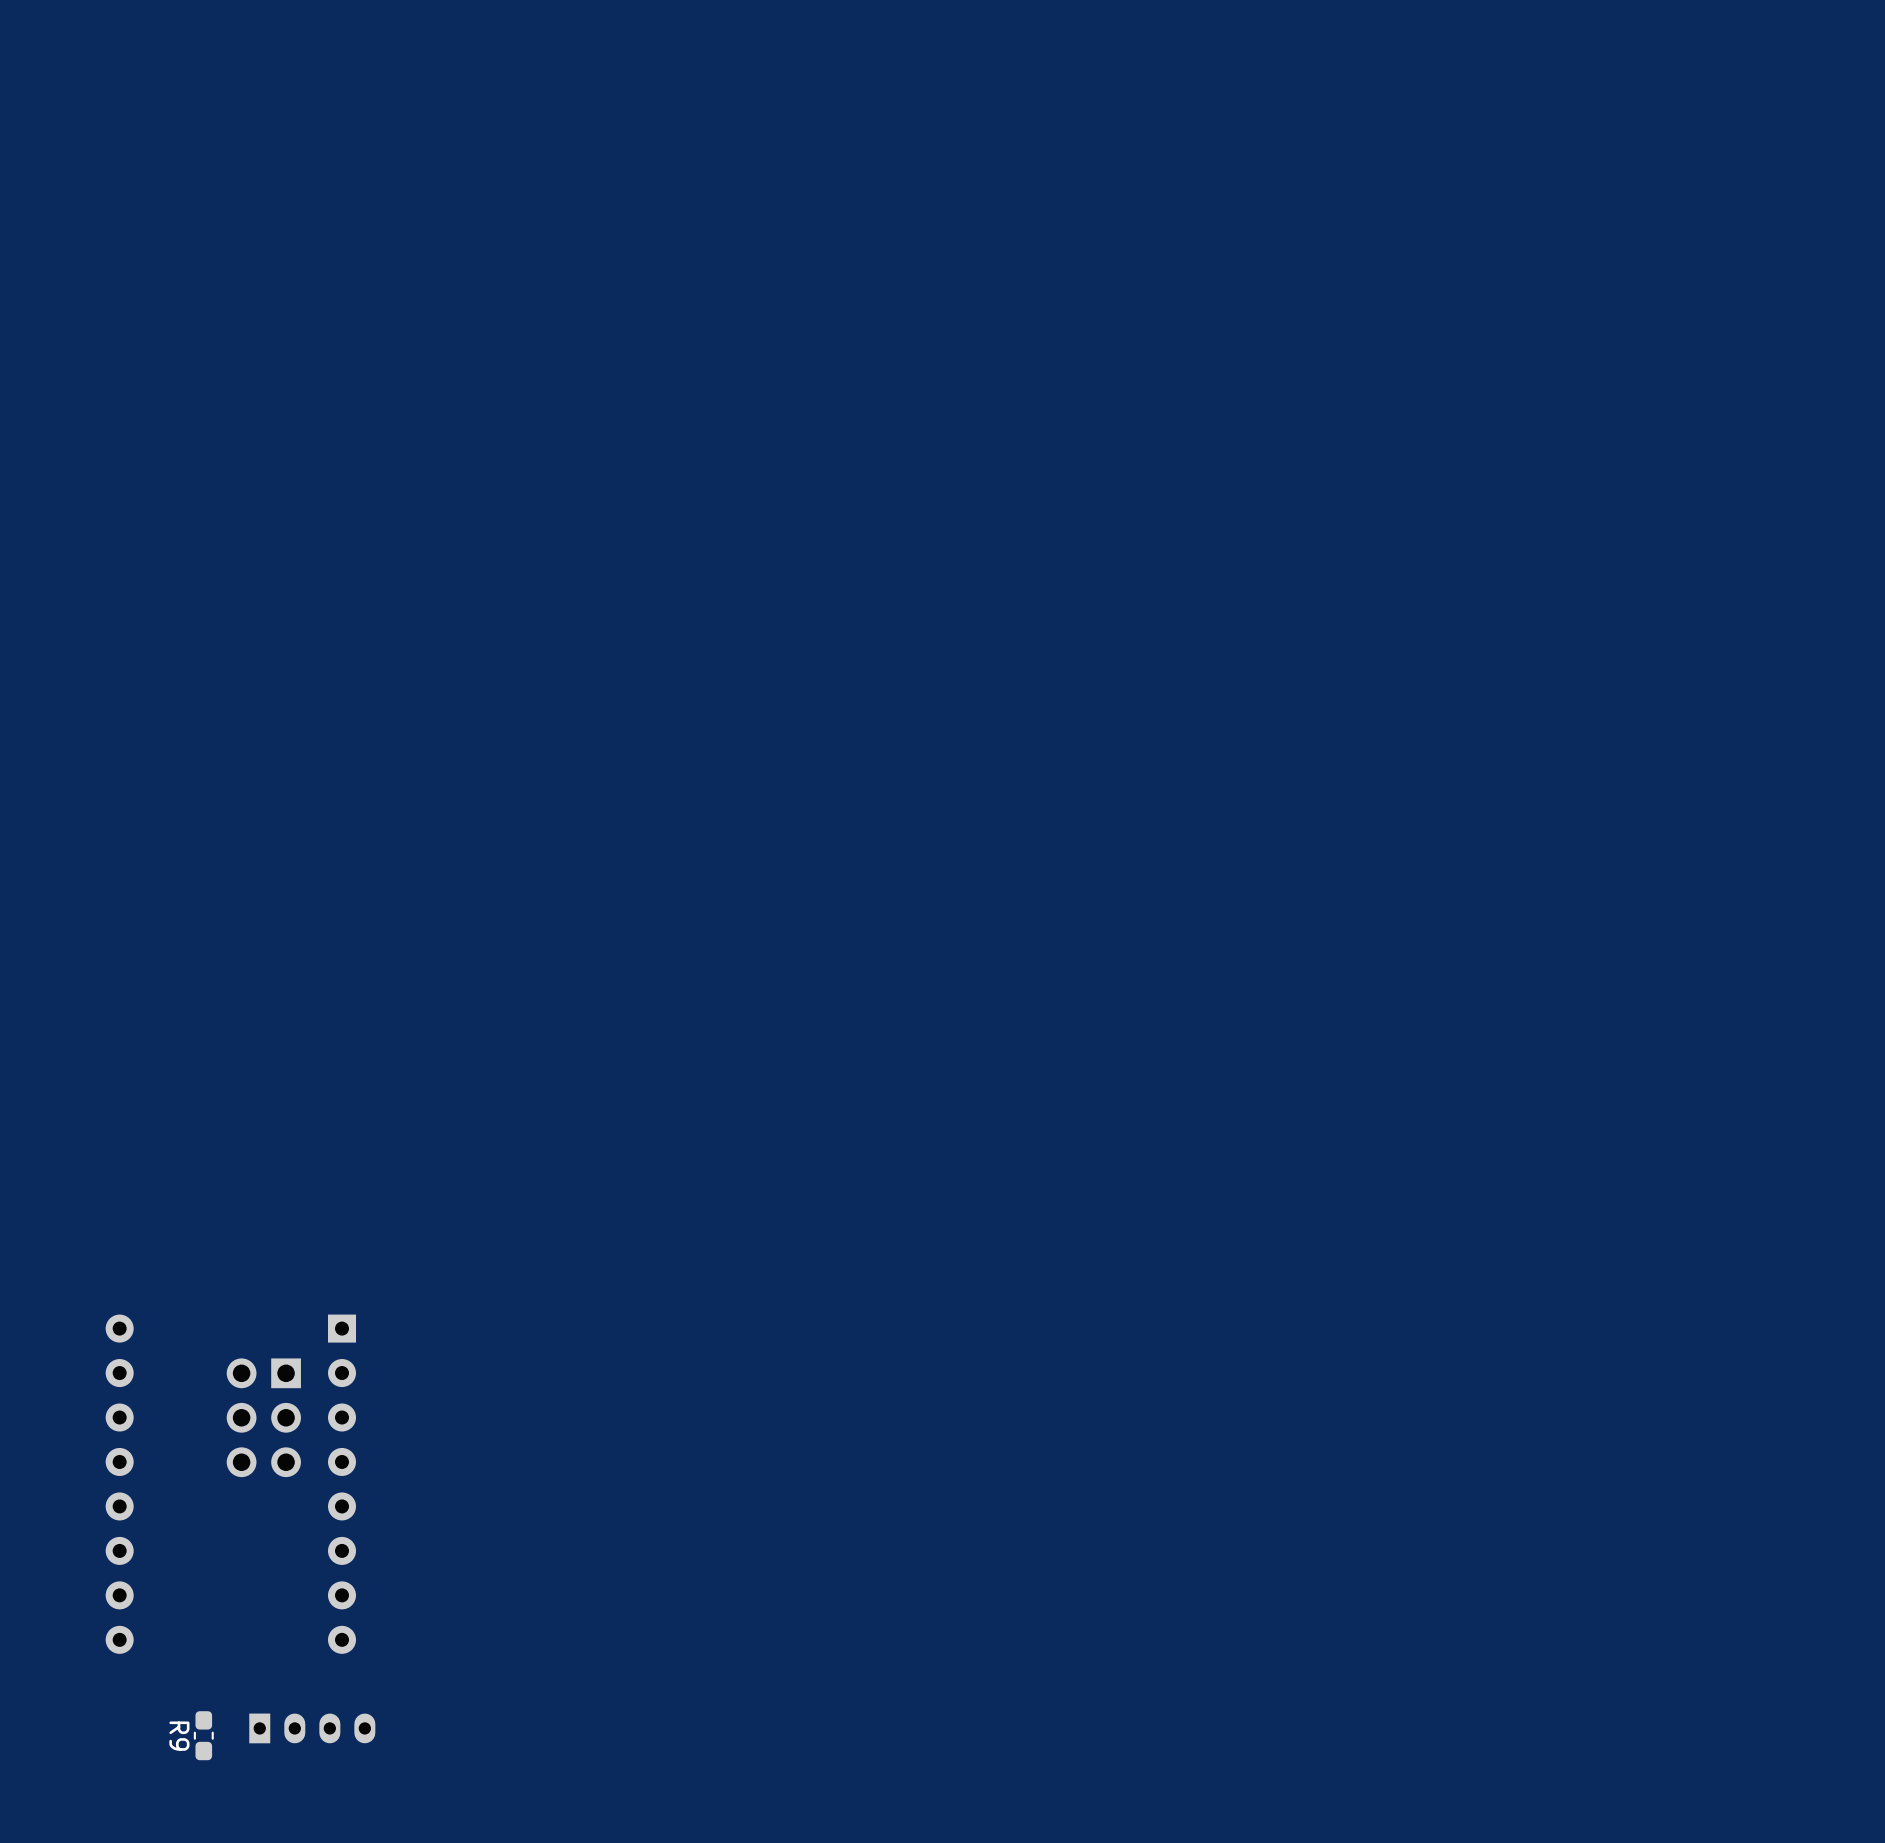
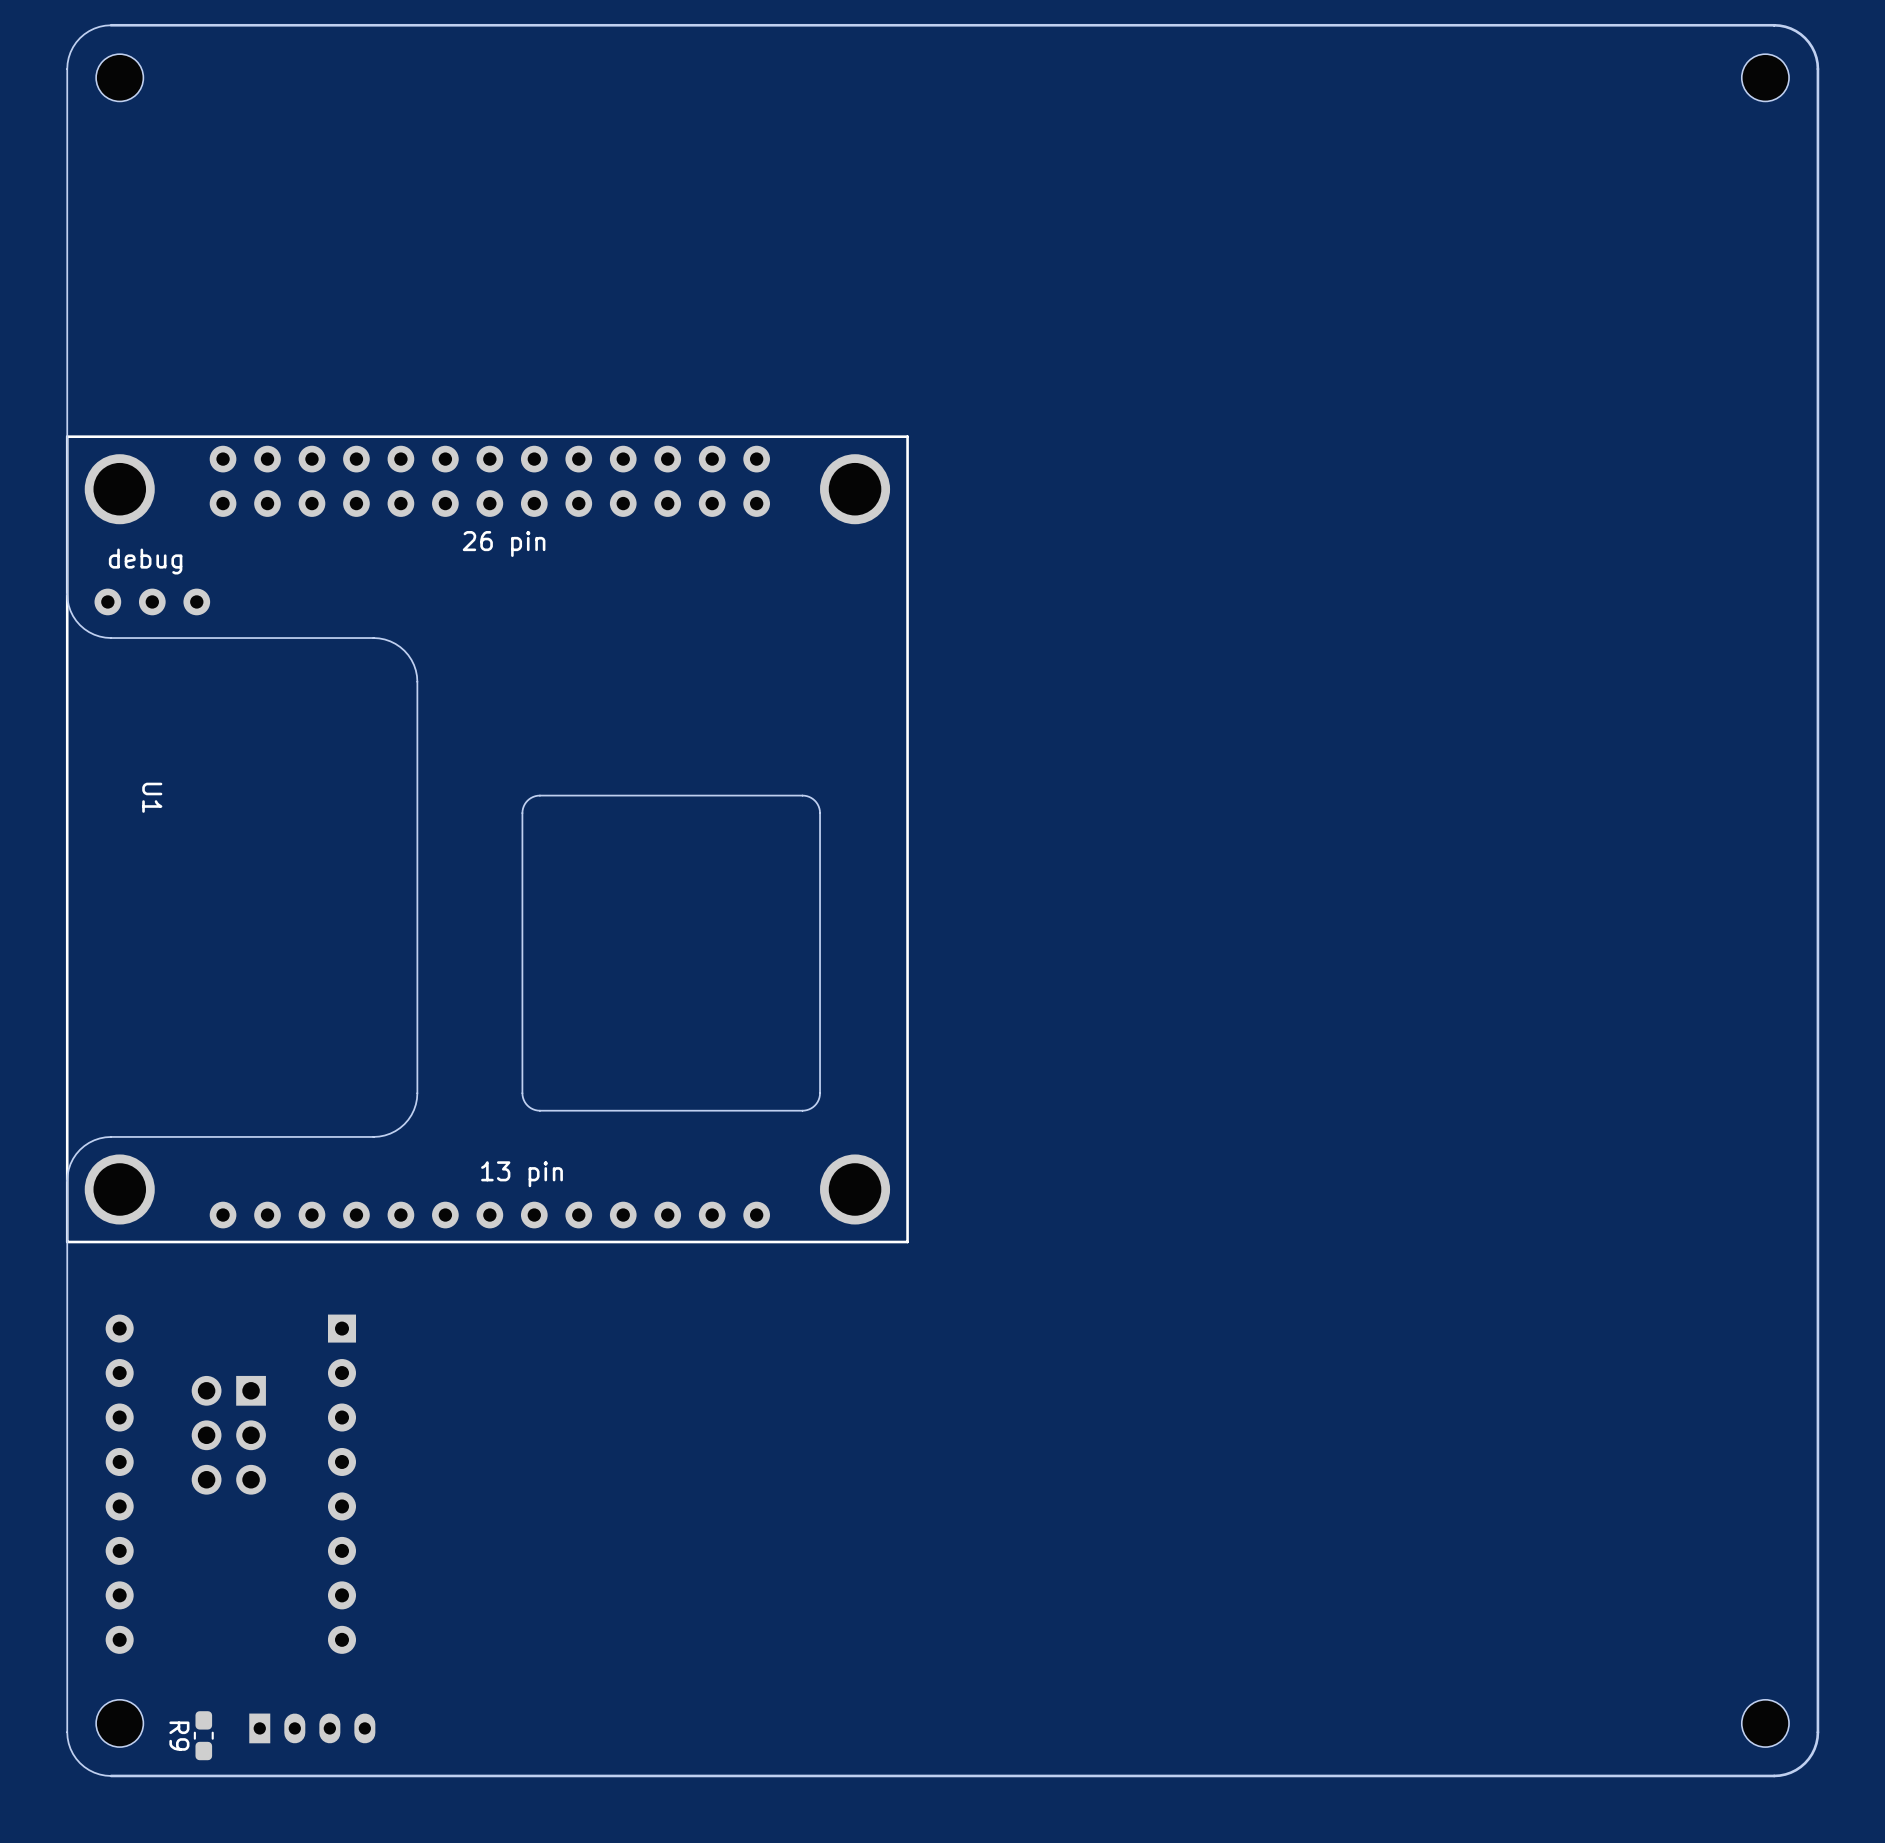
board edge: none -> (1774, 25) (111, 25) (94, 28) (80, 38) (70, 52) (67, 69) (67, 594) (73, 616) (84, 628) (105, 637) (379, 638) (395, 643) (408, 655) (415, 670) (417, 681) (417, 1093) (415, 1104) (408, 1119) (395, 1131) (373, 1136) (105, 1137) (84, 1146) (76, 1154) (68, 1169) (67, 1732) (70, 1748) (80, 1763) (94, 1772) (111, 1775) (1774, 1775) (1790, 1772) (1805, 1763) (1814, 1748) (1817, 1732) (1817, 69) (1814, 52) (1805, 38) (1790, 28) (1774, 25)
part: none -> (119, 77)
part: none -> (1765, 77)
board edge: none -> (802, 795) (539, 795) (527, 800) (522, 813) (522, 1093) (527, 1105) (539, 1110) (802, 1110) (814, 1105) (820, 1093) (820, 813) (814, 800) (802, 795)
U1: none -> (487, 839)
part position: (263, 1417) -> (228, 1435)
part: none -> (119, 1723)
part: none -> (1765, 1723)

